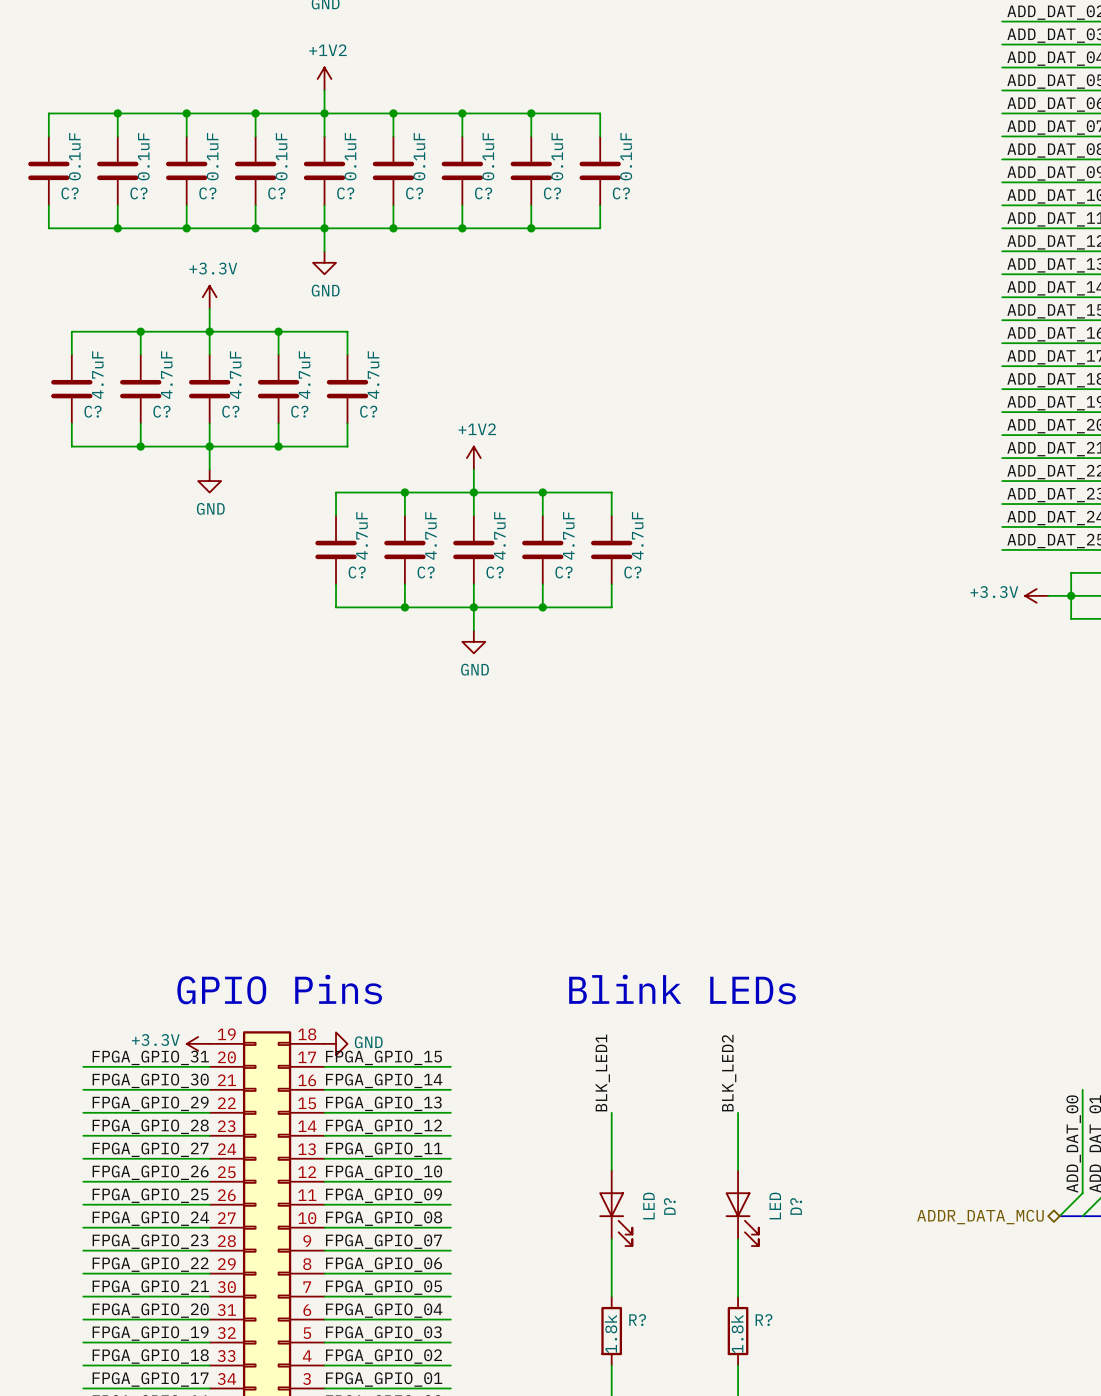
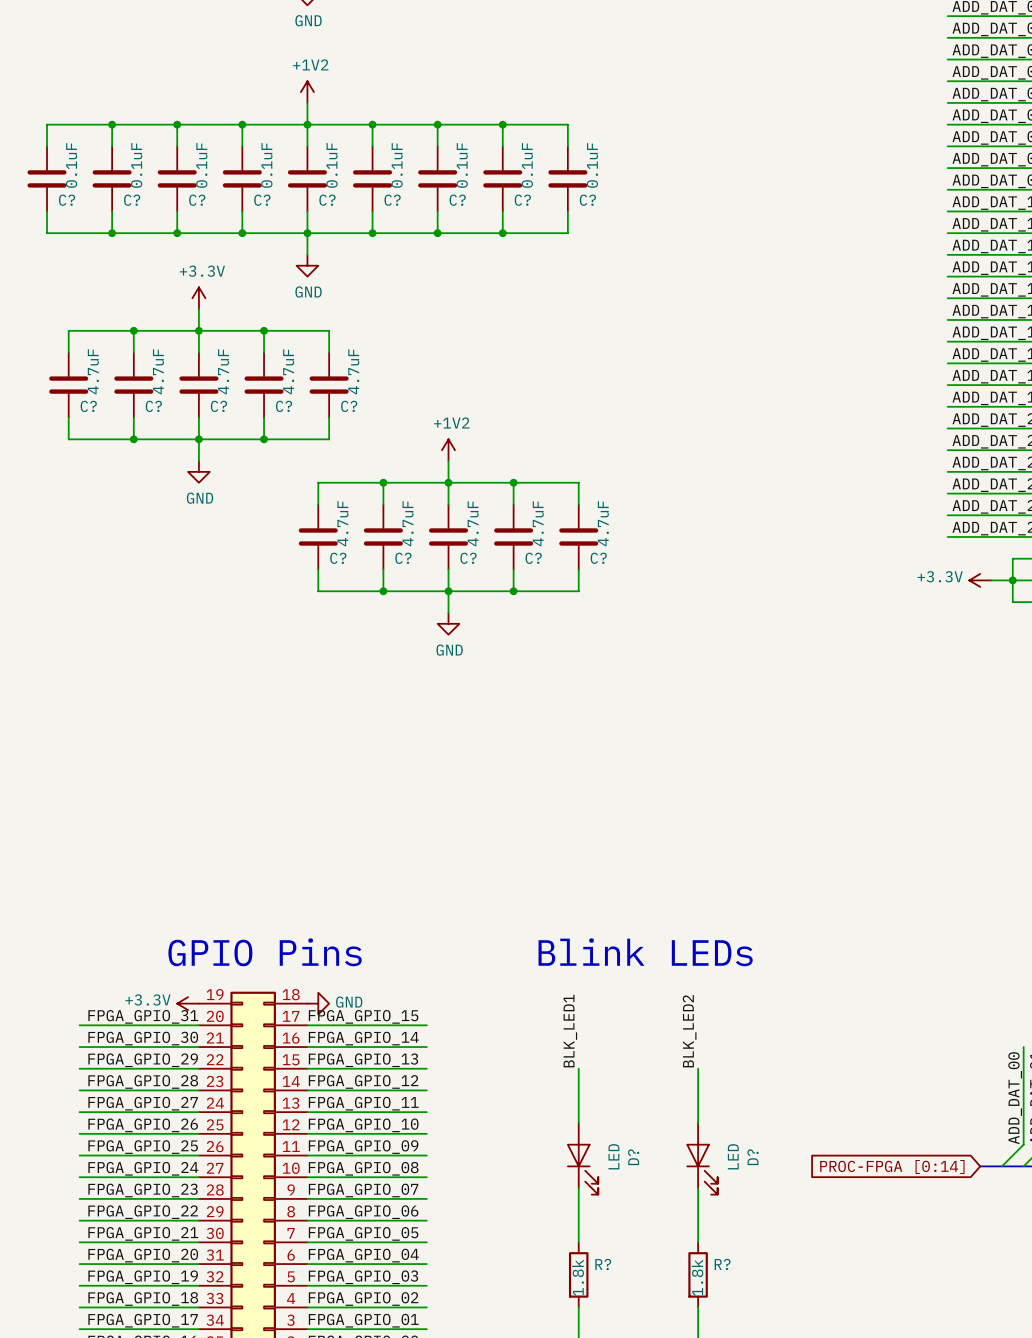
global label: none -> PROC-FPGA [0:14] (892, 1166)
bus: none -> (980, 1166) (1001, 1166)
hierarchical label: ADDR_DATA_MCU (980, 1217) -> none

